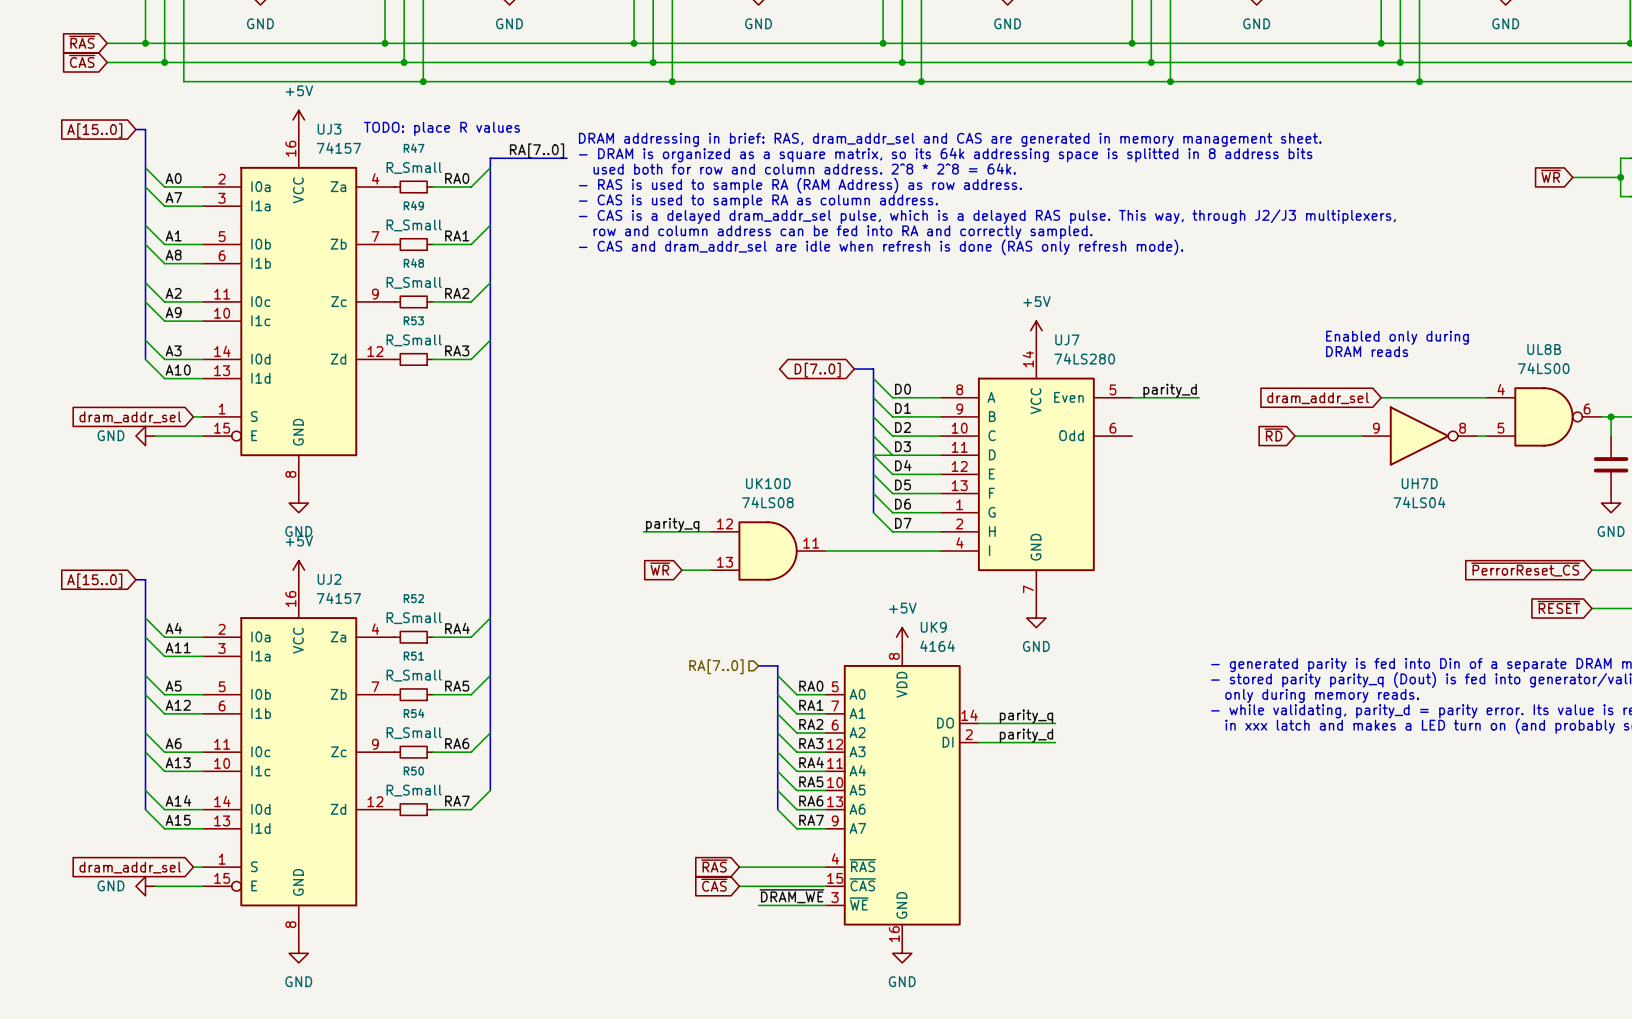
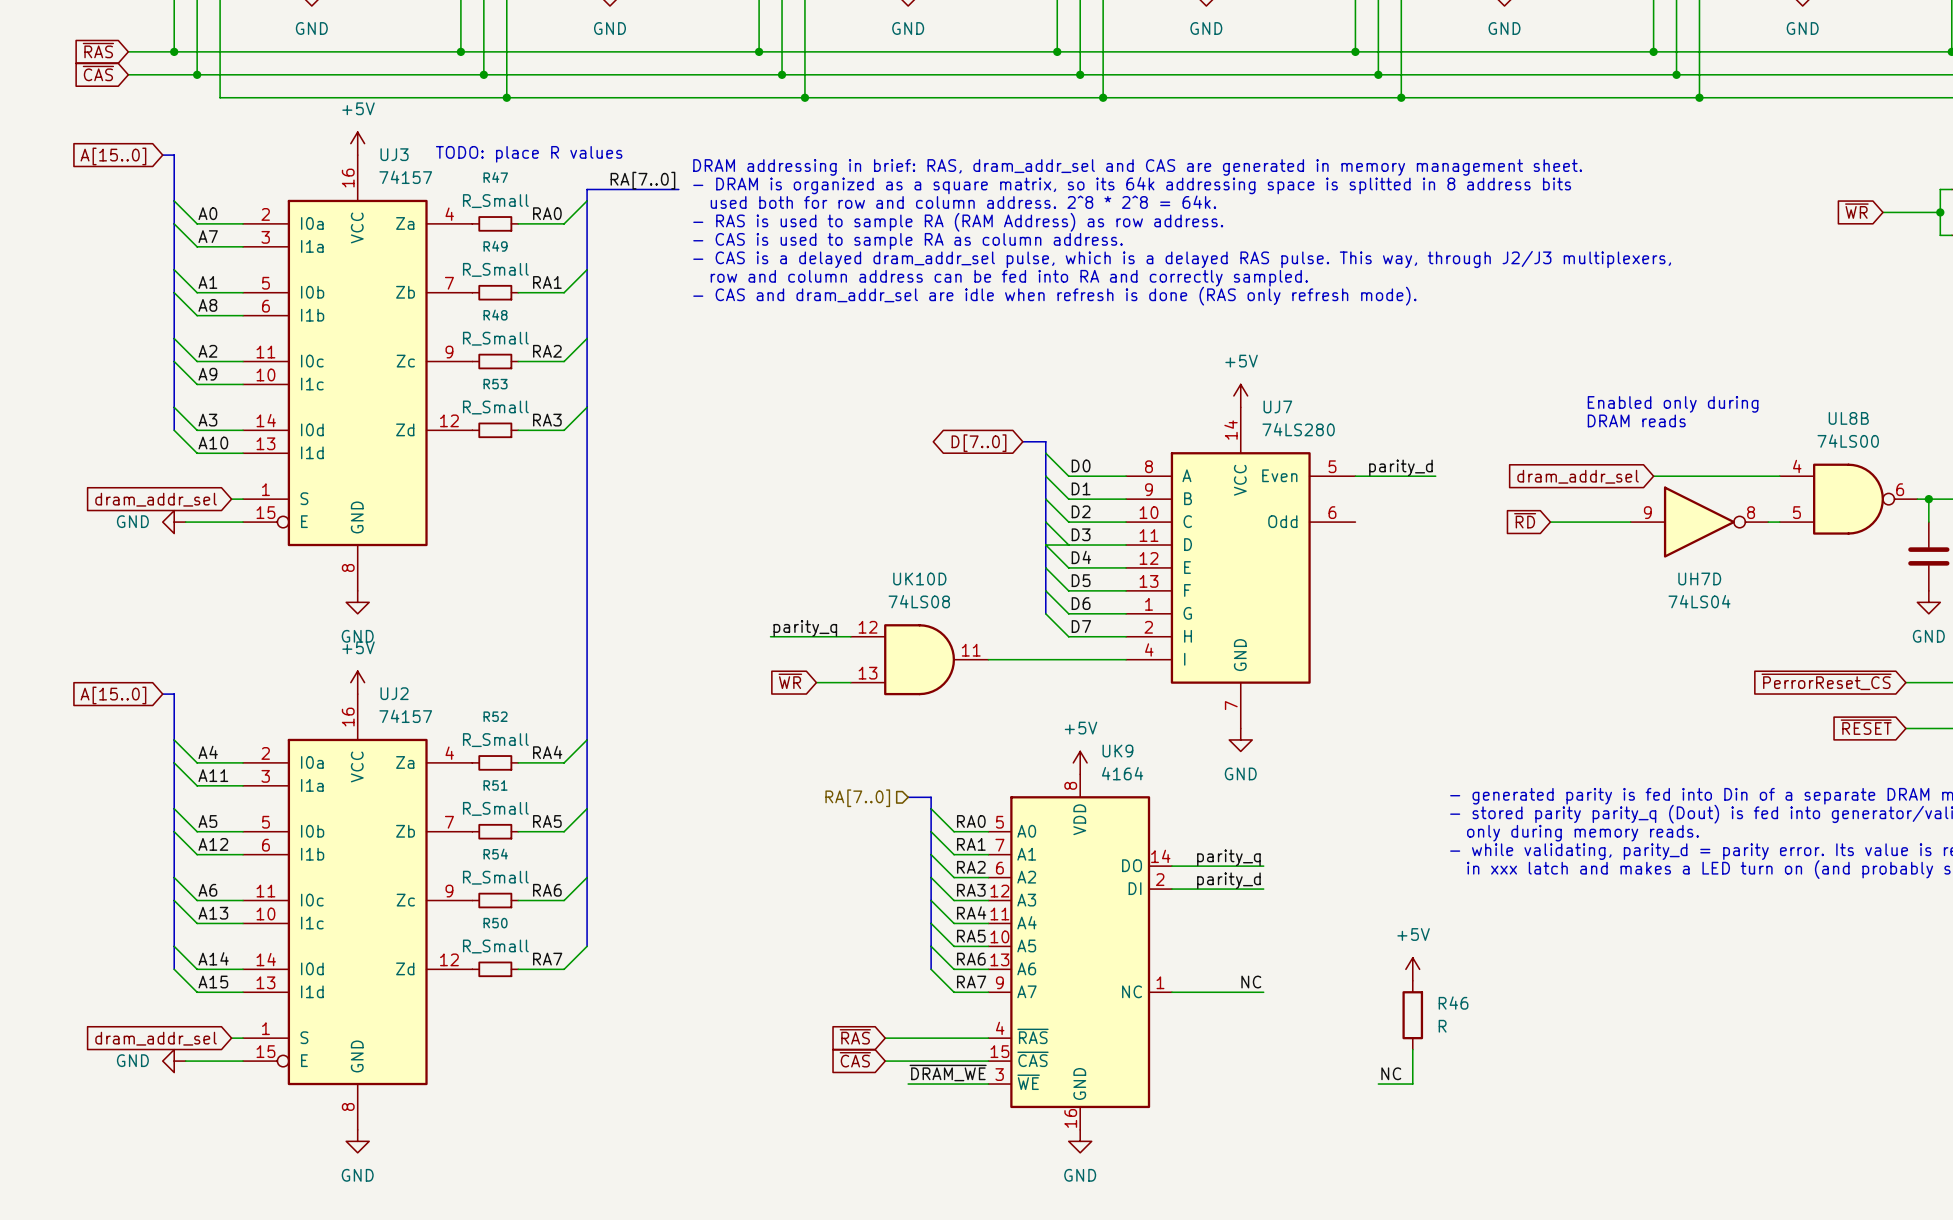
UK9 symbol: [825, 646, 979, 944] -> [988, 774, 1172, 1130]
power symbol: none -> +5V (1412, 969)
label: none -> NC (1251, 982)
wire: none -> (1171, 992) (1263, 992)
R46: none -> R (1412, 1015)
wire: none -> (1412, 1049) (1412, 1084) (1378, 1084)
label: none -> NC (1391, 1073)

